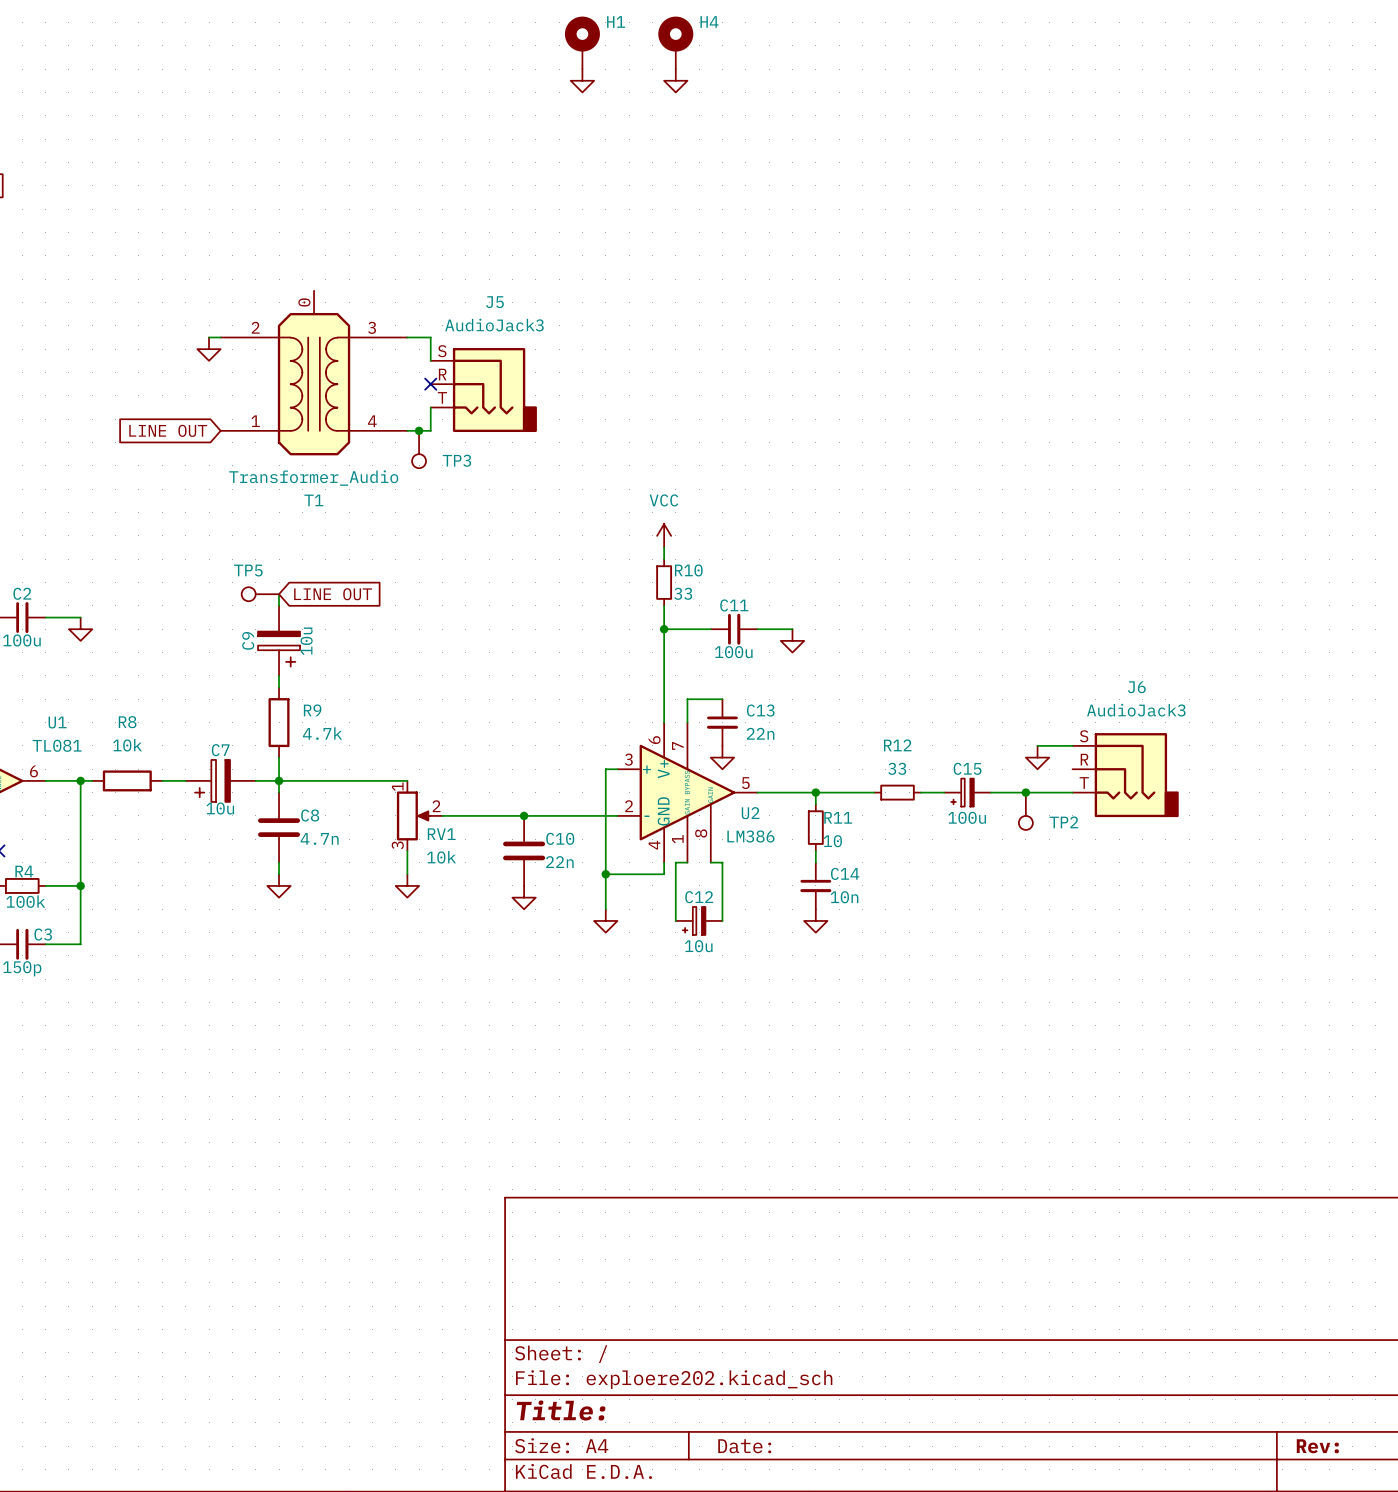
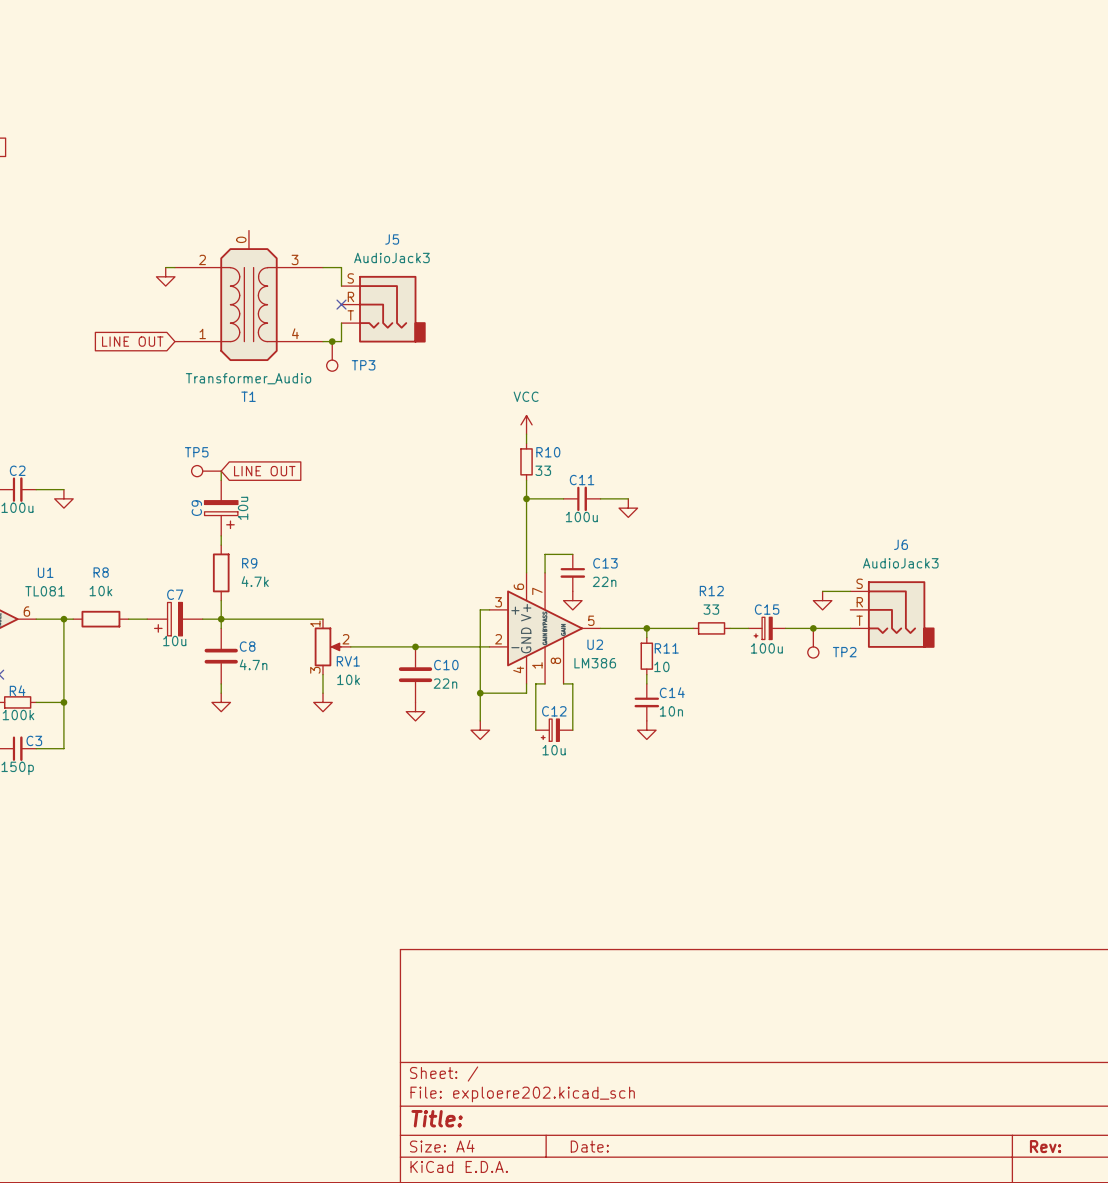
H1: (582, 42) -> none
H4: (675, 42) -> none
power symbol: (582, 80) -> none
power symbol: (675, 80) -> none

